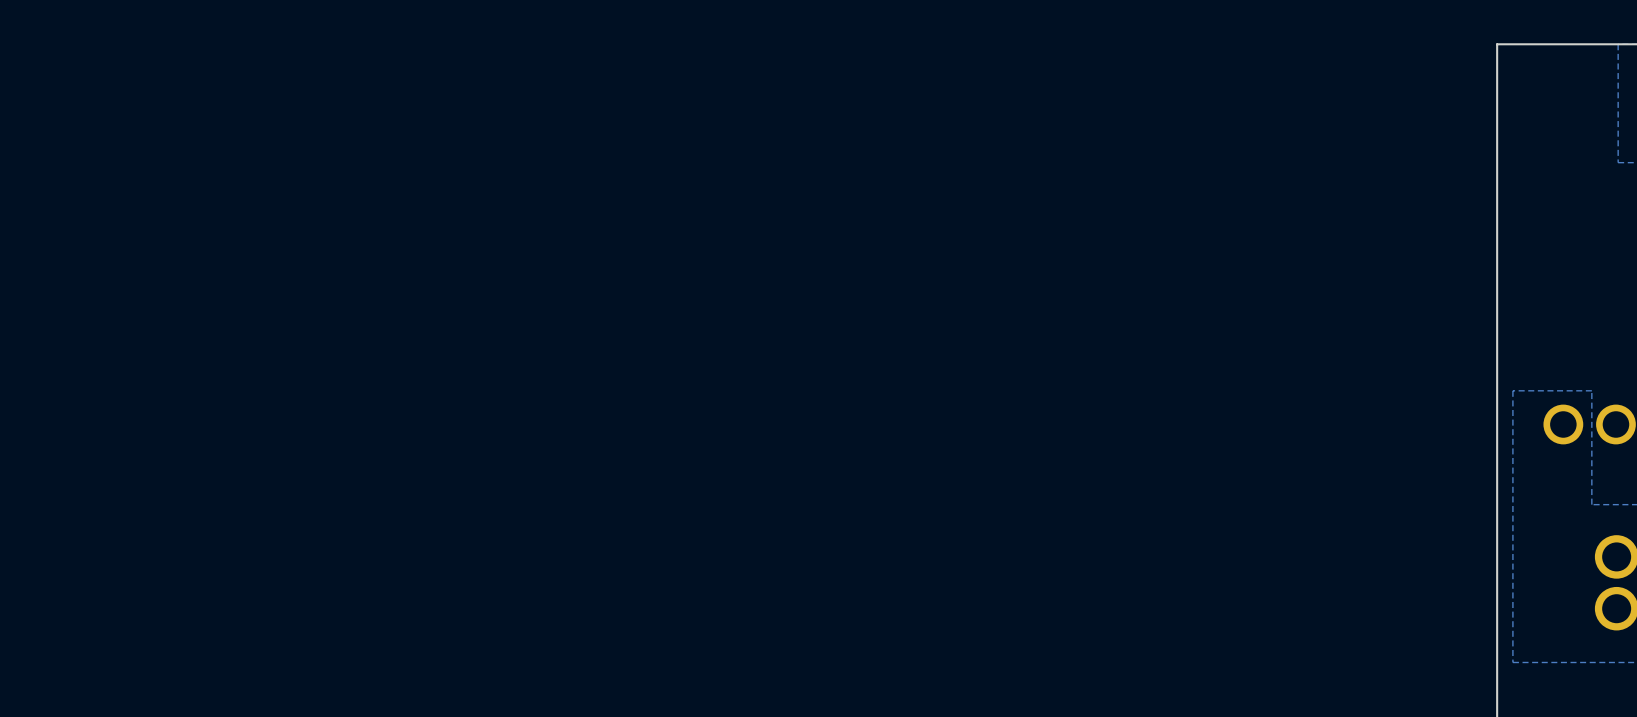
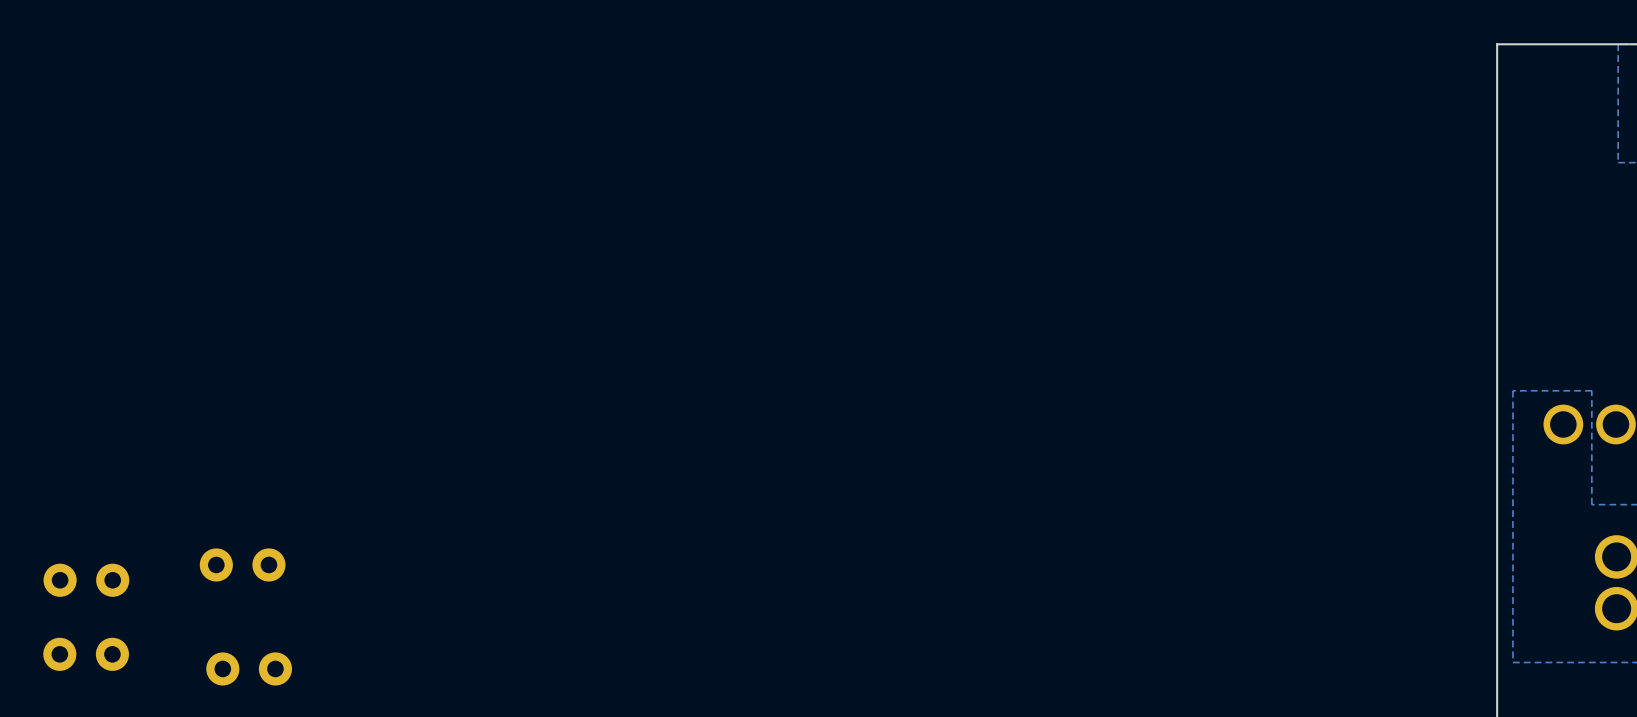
part: none -> (242, 564)
part: none -> (86, 580)
part: none -> (86, 654)
part: none -> (249, 668)

